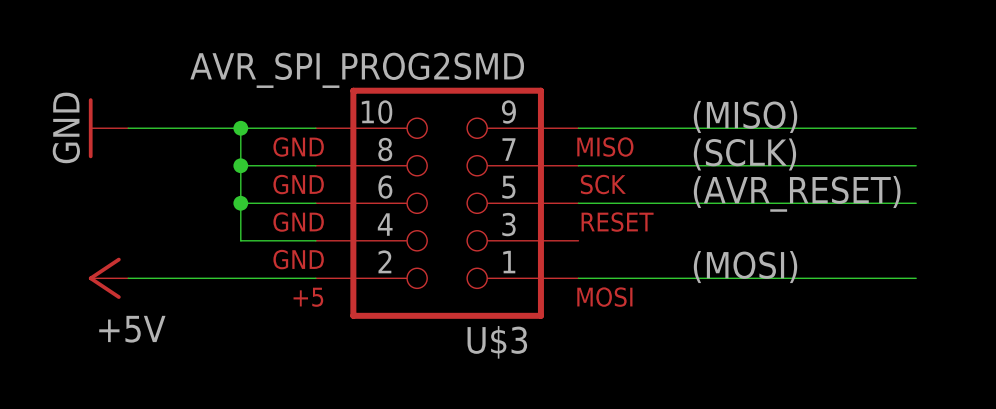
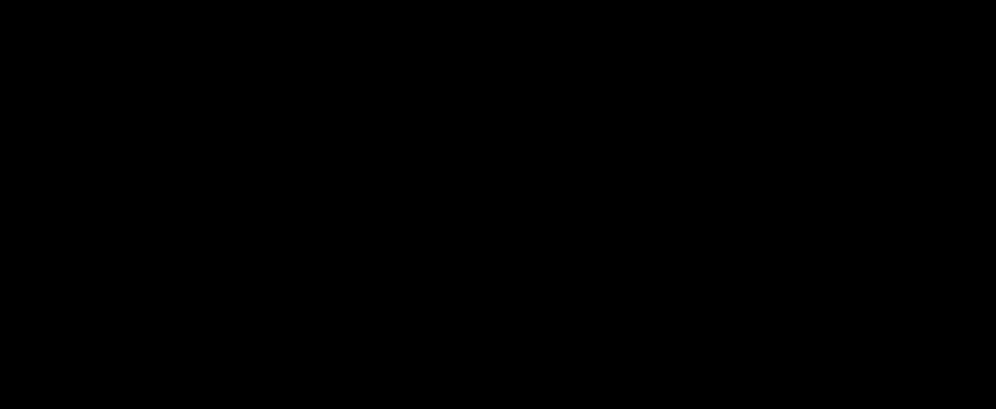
label: (MISO) (745, 116) -> none
power symbol: GND (108, 128) -> none
wire: (128, 128) (315, 128) -> none
wire: (240, 128) (240, 240) (315, 240) -> none
junction: (240, 128) -> none
wire: (578, 128) (916, 128) -> none
label: (SCLK) (744, 154) -> none
wire: (240, 165) (315, 165) -> none
junction: (240, 165) -> none
wire: (578, 165) (916, 165) -> none
label: (AVR_RESET) (797, 193) -> none
wire: (240, 203) (315, 203) -> none
junction: (240, 203) -> none
U$3: AVR_SPI_PROG2SMD (447, 203) -> none
wire: (578, 203) (916, 203) -> none
label: (MOSI) (745, 267) -> none
power symbol: +5V (108, 278) -> none
wire: (128, 278) (315, 278) -> none
wire: (578, 278) (916, 278) -> none

